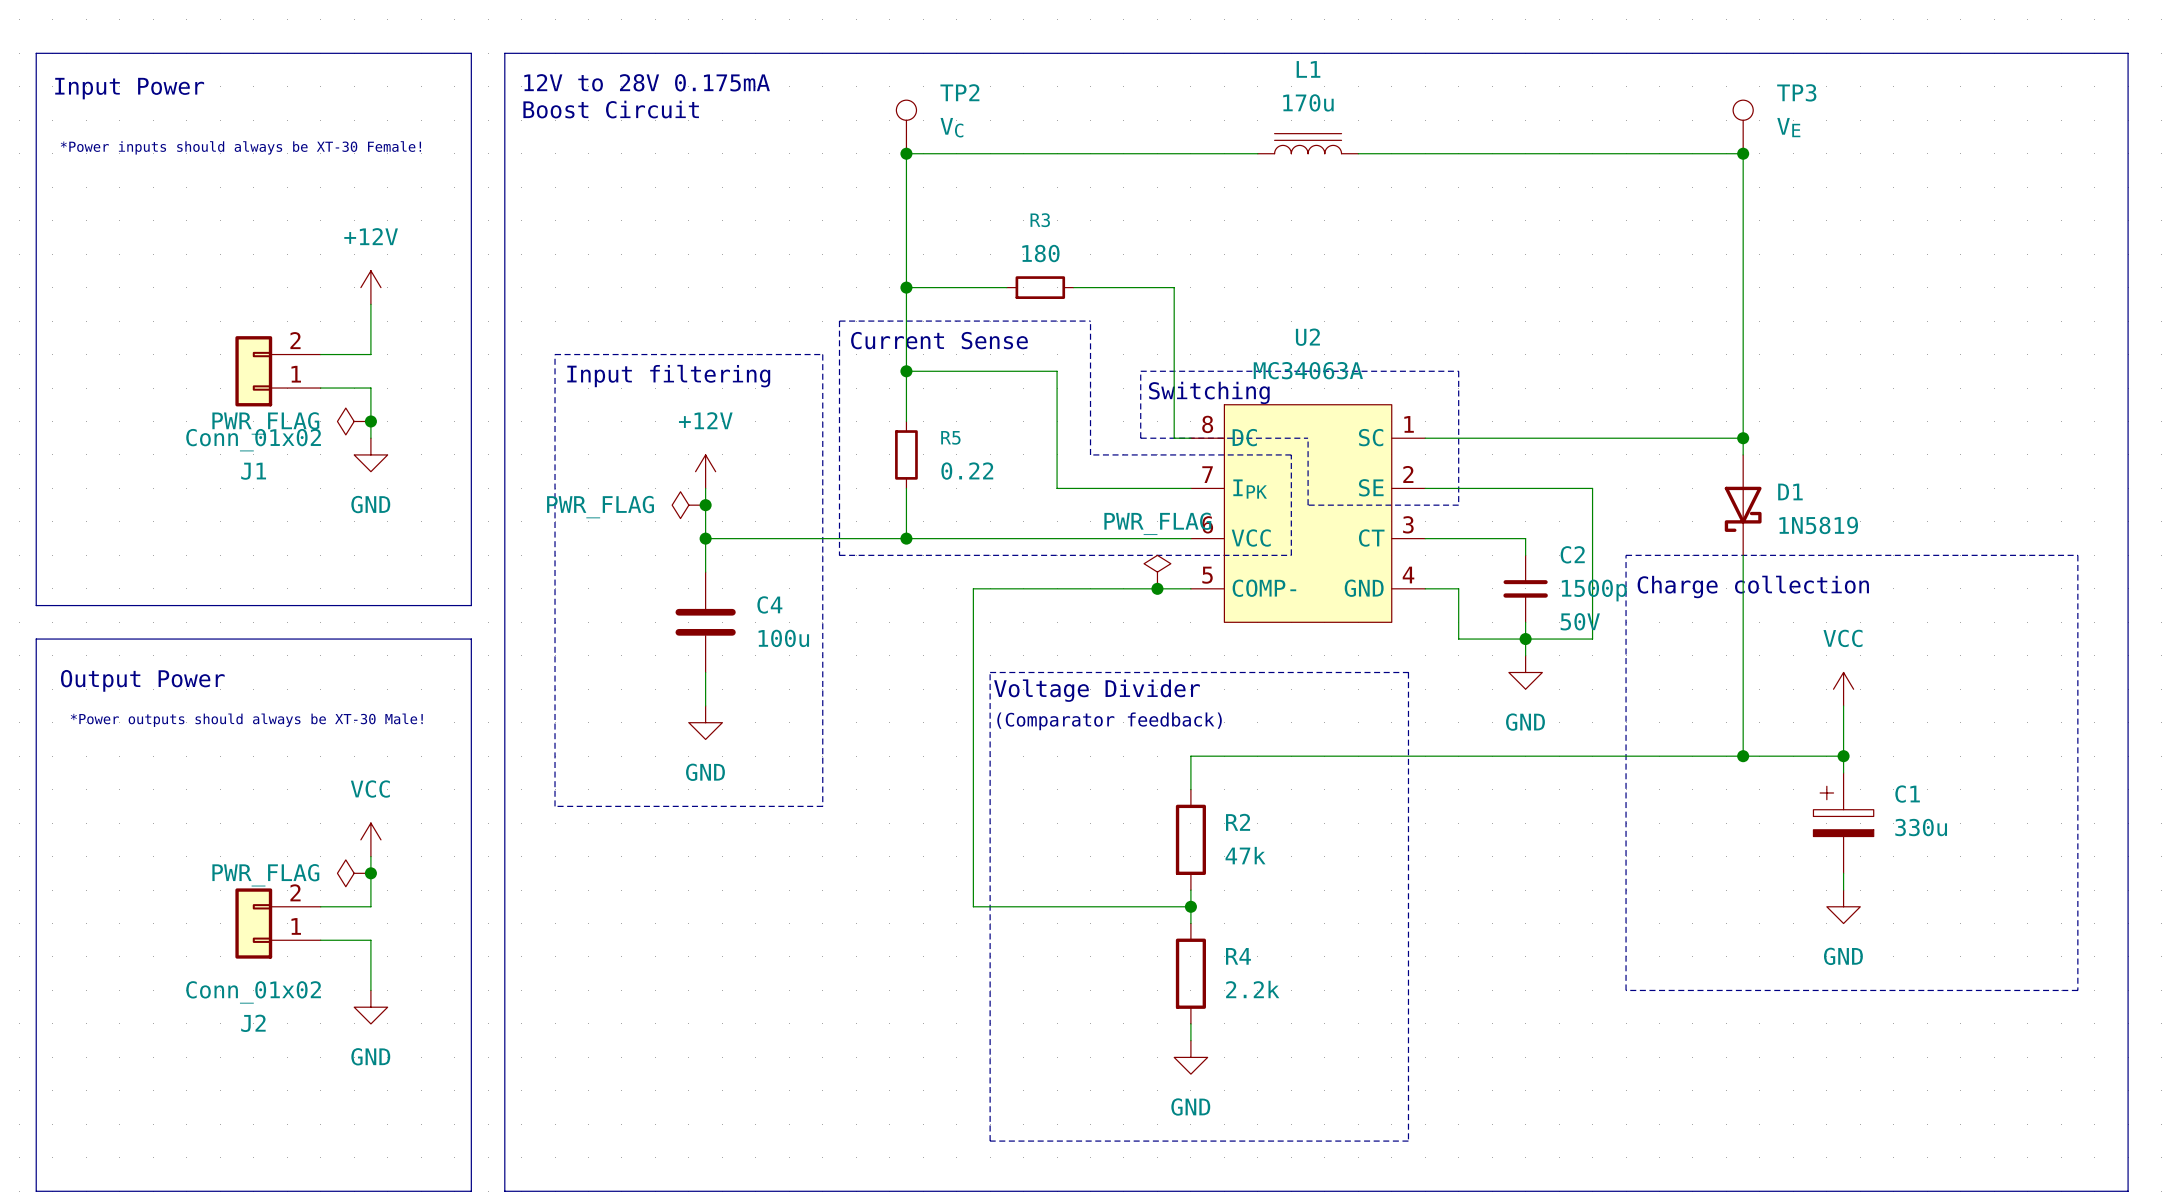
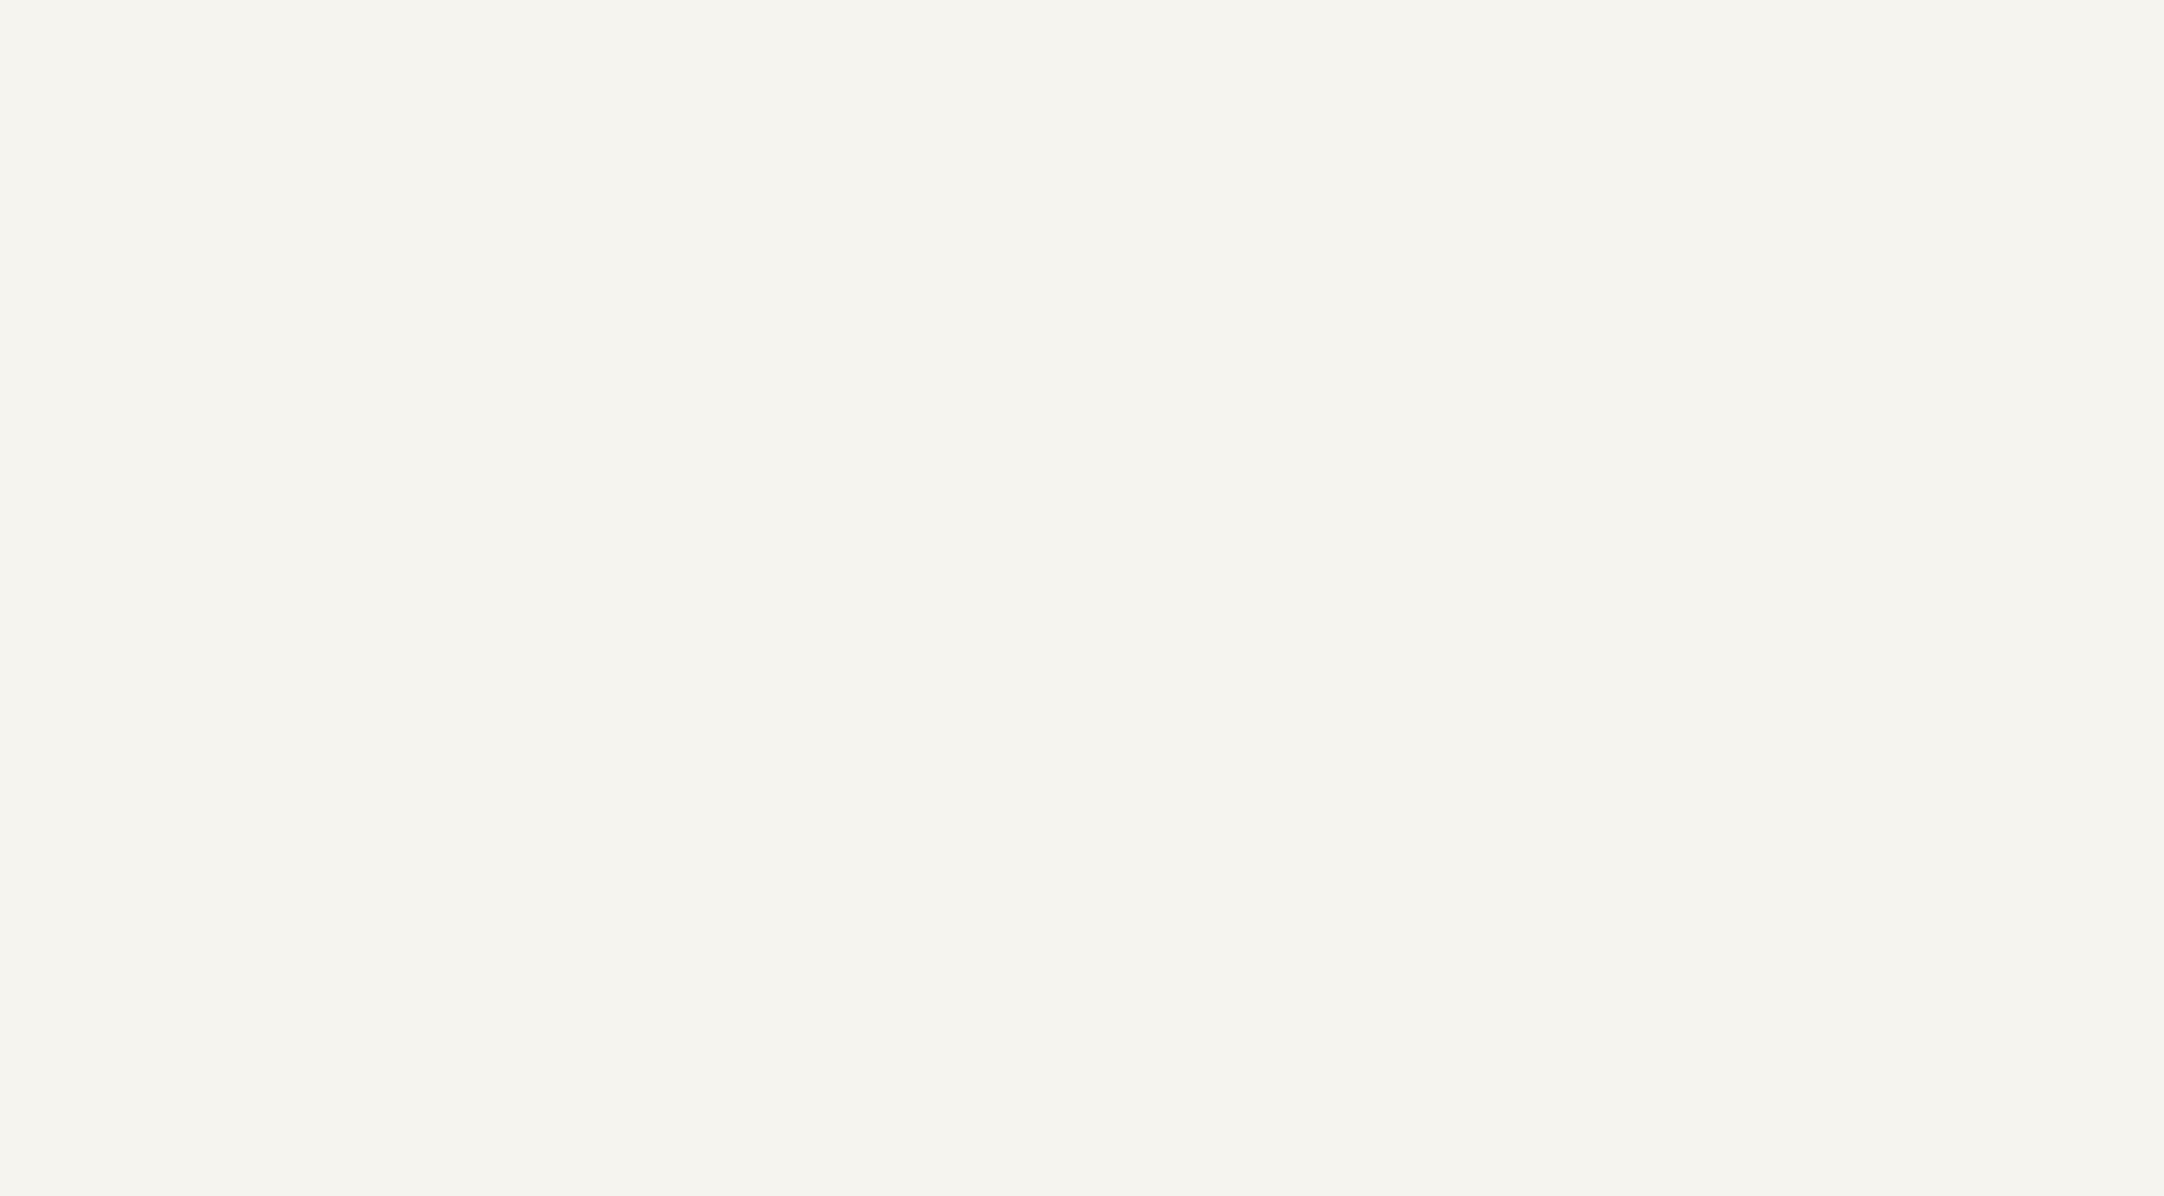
line: (36, 53) (36, 605) (471, 605) (471, 53) (36, 53) -> none
line: (504, 53) (2128, 53) (2128, 1191) (504, 1191) (504, 53) -> none
text: 12V to 28V 0.175mA (647, 82) -> none
text: Input Power (129, 88) -> none
text: Boost Circuit (611, 109) -> none
TP2: VC (906, 126) -> none
TP3: VE (1743, 126) -> none
L1: 170u (1308, 143) -> none
text: *Power inputs should always be XT-30 Female! (240, 147) -> none
junction: (906, 153) -> none
wire: (1257, 153) (906, 153) (906, 421) -> none
wire: (1358, 153) (1743, 153) (1743, 454) -> none
junction: (1743, 153) -> none
power symbol: +12V (370, 287) -> none
wire: (906, 287) (1006, 287) -> none
junction: (906, 287) -> none
R3: 180 (1040, 287) -> none
wire: (1073, 287) (1174, 287) (1174, 438) (1190, 438) -> none
wire: (370, 304) (370, 354) (320, 354) -> none
line: (839, 321) (839, 555) (1291, 555) (1291, 454) (1090, 454) (1090, 321) (839, 321) -> none
text: Current Sense (939, 340) -> none
line: (555, 354) (822, 354) (822, 806) (555, 806) (555, 354) -> none
J1: Conn_01x02 (278, 371) -> none
wire: (906, 371) (1057, 371) (1057, 488) (1190, 488) -> none
junction: (906, 371) -> none
line: (1140, 371) (1140, 438) (1308, 438) (1308, 505) (1458, 505) (1458, 371) (1140, 371) -> none
text: Input filtering (668, 376) -> none
wire: (320, 388) (370, 388) (370, 438) -> none
text: Switching (1209, 392) -> none
power symbol: PWR_FLAG (354, 421) -> none
junction: (370, 421) -> none
wire: (1425, 438) (1743, 438) -> none
junction: (1743, 438) -> none
power symbol: GND (370, 454) -> none
R5: 0.22 (906, 454) -> none
power symbol: +12V (705, 471) -> none
wire: (705, 488) (705, 572) -> none
wire: (906, 488) (906, 538) -> none
wire: (1425, 488) (1592, 488) (1592, 639) (1458, 639) (1458, 588) (1425, 588) -> none
power symbol: PWR_FLAG (688, 505) -> none
junction: (705, 505) -> none
D1: 1N5819 (1743, 505) -> none
U2: MC34063A (1308, 513) -> none
wire: (705, 538) (1190, 538) -> none
junction: (705, 538) -> none
junction: (906, 538) -> none
wire: (1425, 538) (1525, 538) (1525, 555) -> none
line: (1626, 555) (2077, 555) (2077, 990) (1626, 990) (1626, 555) -> none
wire: (1743, 555) (1743, 756) -> none
power symbol: PWR_FLAG (1157, 572) -> none
text: Charge collection (1753, 586) -> none
junction: (1157, 588) -> none
wire: (1190, 588) (973, 588) (973, 906) (1190, 906) -> none
C2: 1500p (1525, 588) -> none
C4: 100u (705, 622) -> none
wire: (1525, 622) (1525, 655) -> none
line: (36, 639) (471, 639) (471, 1191) (36, 1191) (36, 639) -> none
junction: (1525, 639) -> none
wire: (705, 672) (705, 705) -> none
line: (990, 672) (1408, 672) (1408, 1141) (990, 1141) (990, 672) -> none
power symbol: GND (1525, 672) -> none
text: Output Power (142, 680) -> none
power symbol: VCC (1843, 689) -> none
text: Voltage Divider (1096, 690) -> none
wire: (1843, 705) (1843, 772) -> none
text: *Power outputs should always be XT-30 Male! (246, 720) -> none
text: (Comparator feedback) (1109, 721) -> none
power symbol: GND (705, 722) -> none
junction: (1743, 756) -> none
wire: (1843, 756) (1190, 756) (1190, 789) -> none
junction: (1843, 756) -> none
C1: 330u (1843, 823) -> none
power symbol: VCC (370, 839) -> none
R2: 47k (1190, 839) -> none
wire: (370, 856) (370, 906) (320, 906) -> none
power symbol: PWR_FLAG (354, 873) -> none
junction: (370, 873) -> none
wire: (1843, 873) (1843, 890) -> none
wire: (1190, 890) (1190, 923) -> none
junction: (1190, 906) -> none
power symbol: GND (1843, 906) -> none
J2: Conn_01x02 (278, 923) -> none
wire: (320, 940) (370, 940) (370, 990) -> none
R4: 2.2k (1190, 973) -> none
power symbol: GND (370, 1007) -> none
wire: (1190, 1023) (1190, 1040) -> none
power symbol: GND (1190, 1057) -> none

